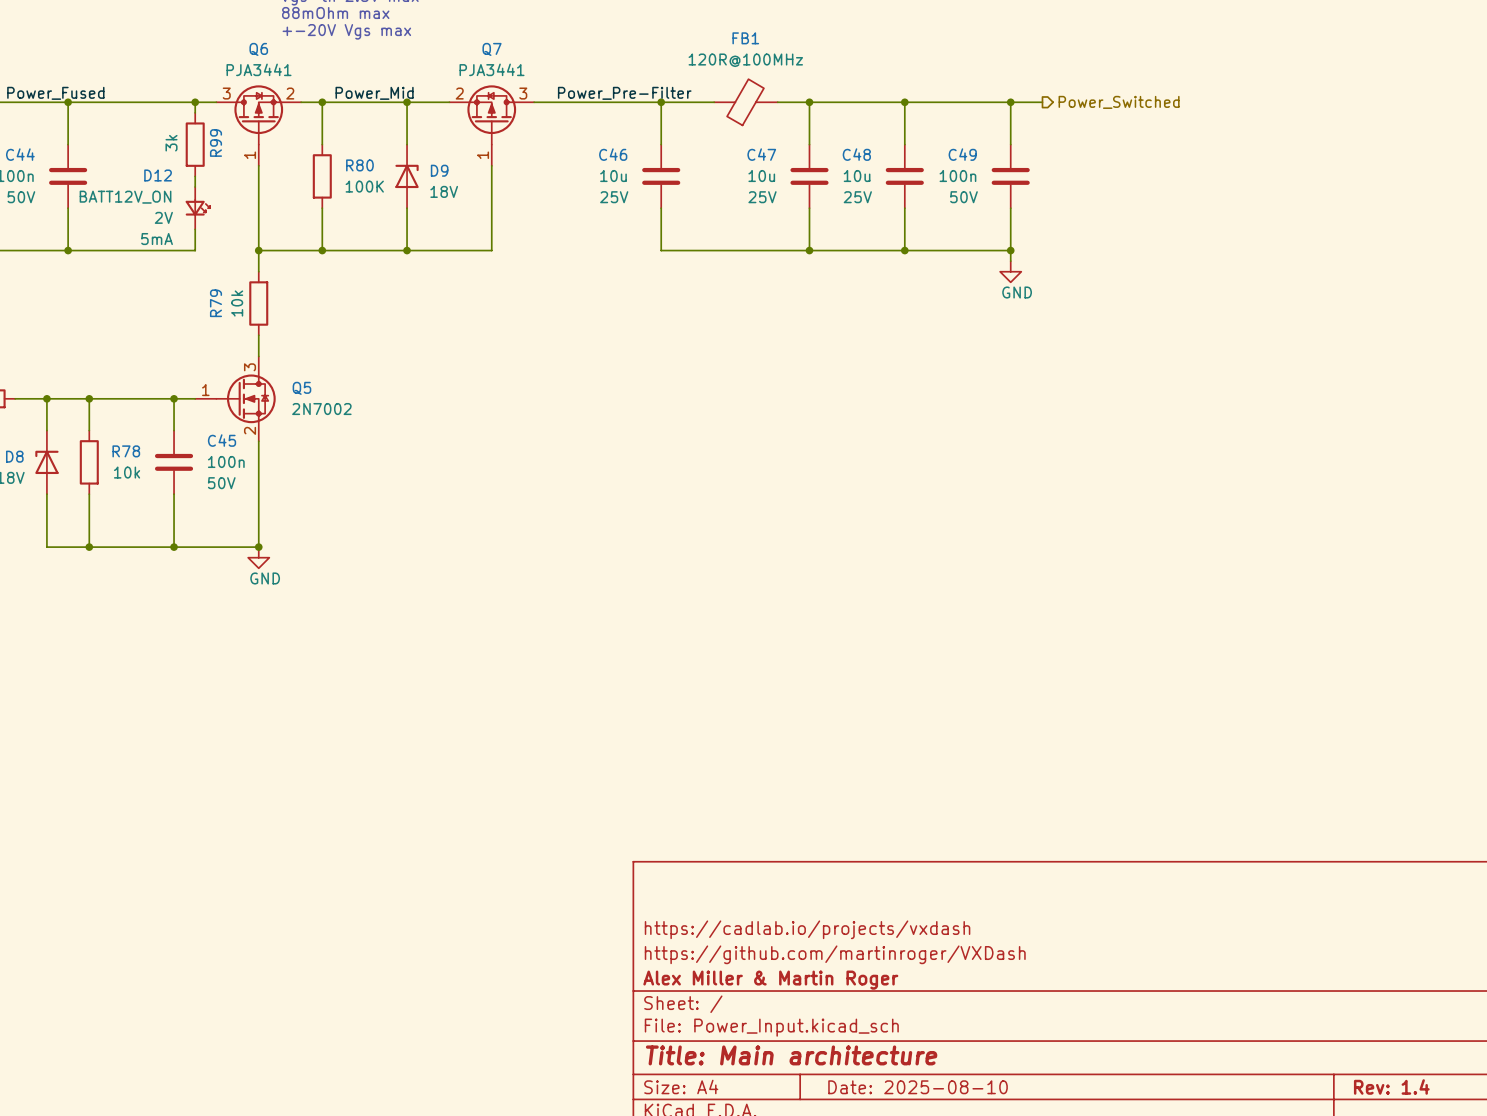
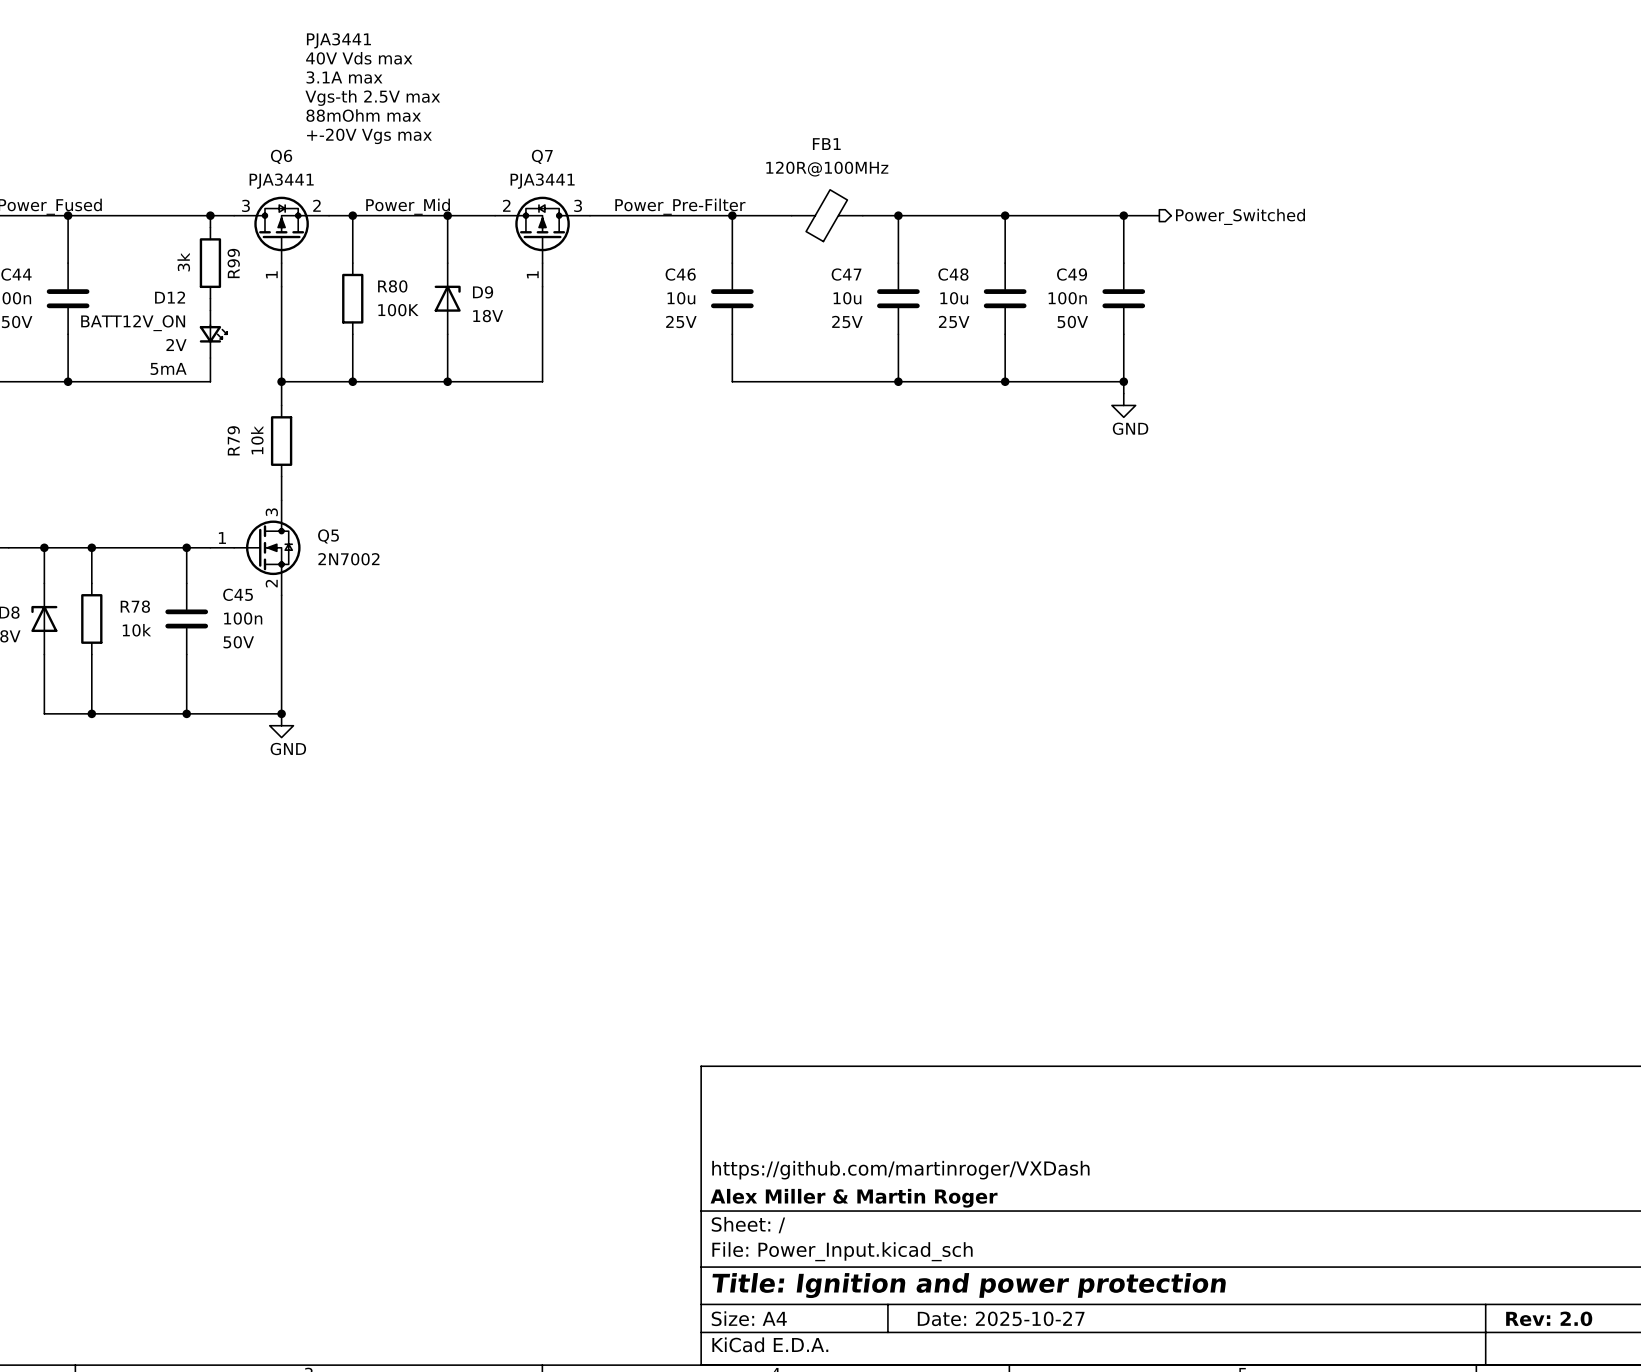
title block: https://cadlab.io/projects/vxdash (807, 929) -> none
title block: Title: Main architecture (791, 1055) -> Title: Ignition and power protection (969, 1285)
title block: Rev: 1.4 (1391, 1086) -> Rev: 2.0 (1549, 1318)
title block: Date: 2025-08-10 (918, 1087) -> Date: 2025-10-27 (1001, 1318)

